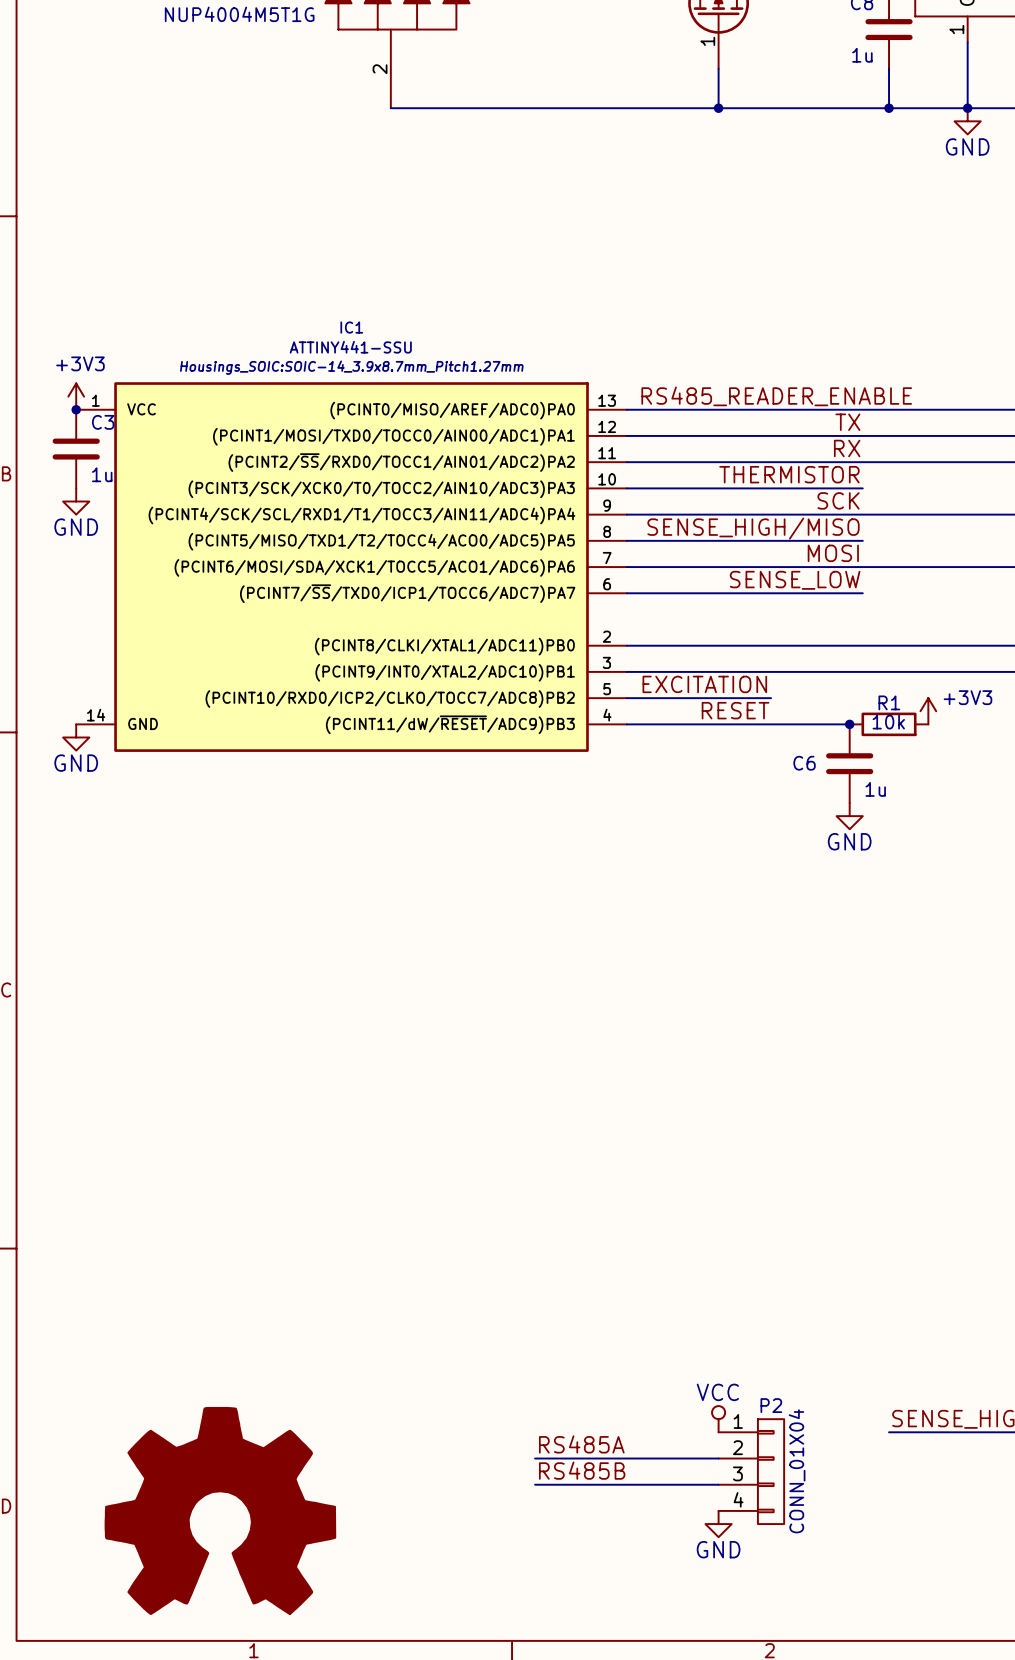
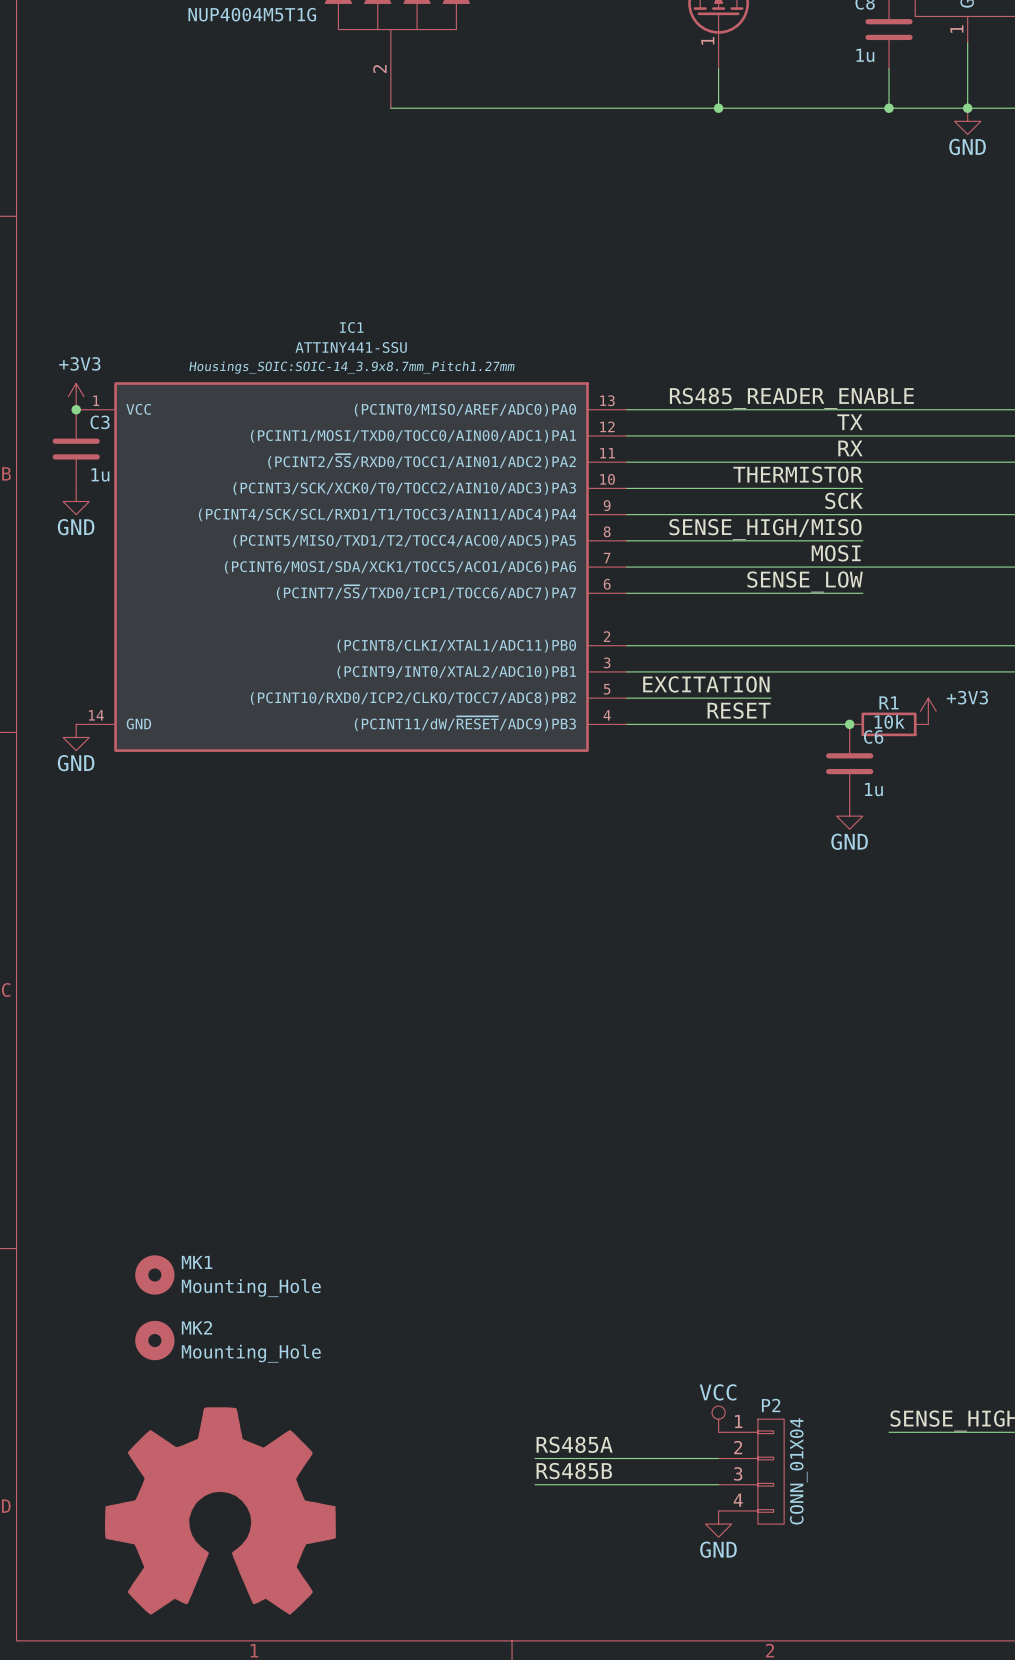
C6 name position: C6 (804, 763) -> C6 (873, 737)
MK1: none -> Mounting_Hole (154, 1274)
MK2: none -> Mounting_Hole (154, 1340)

